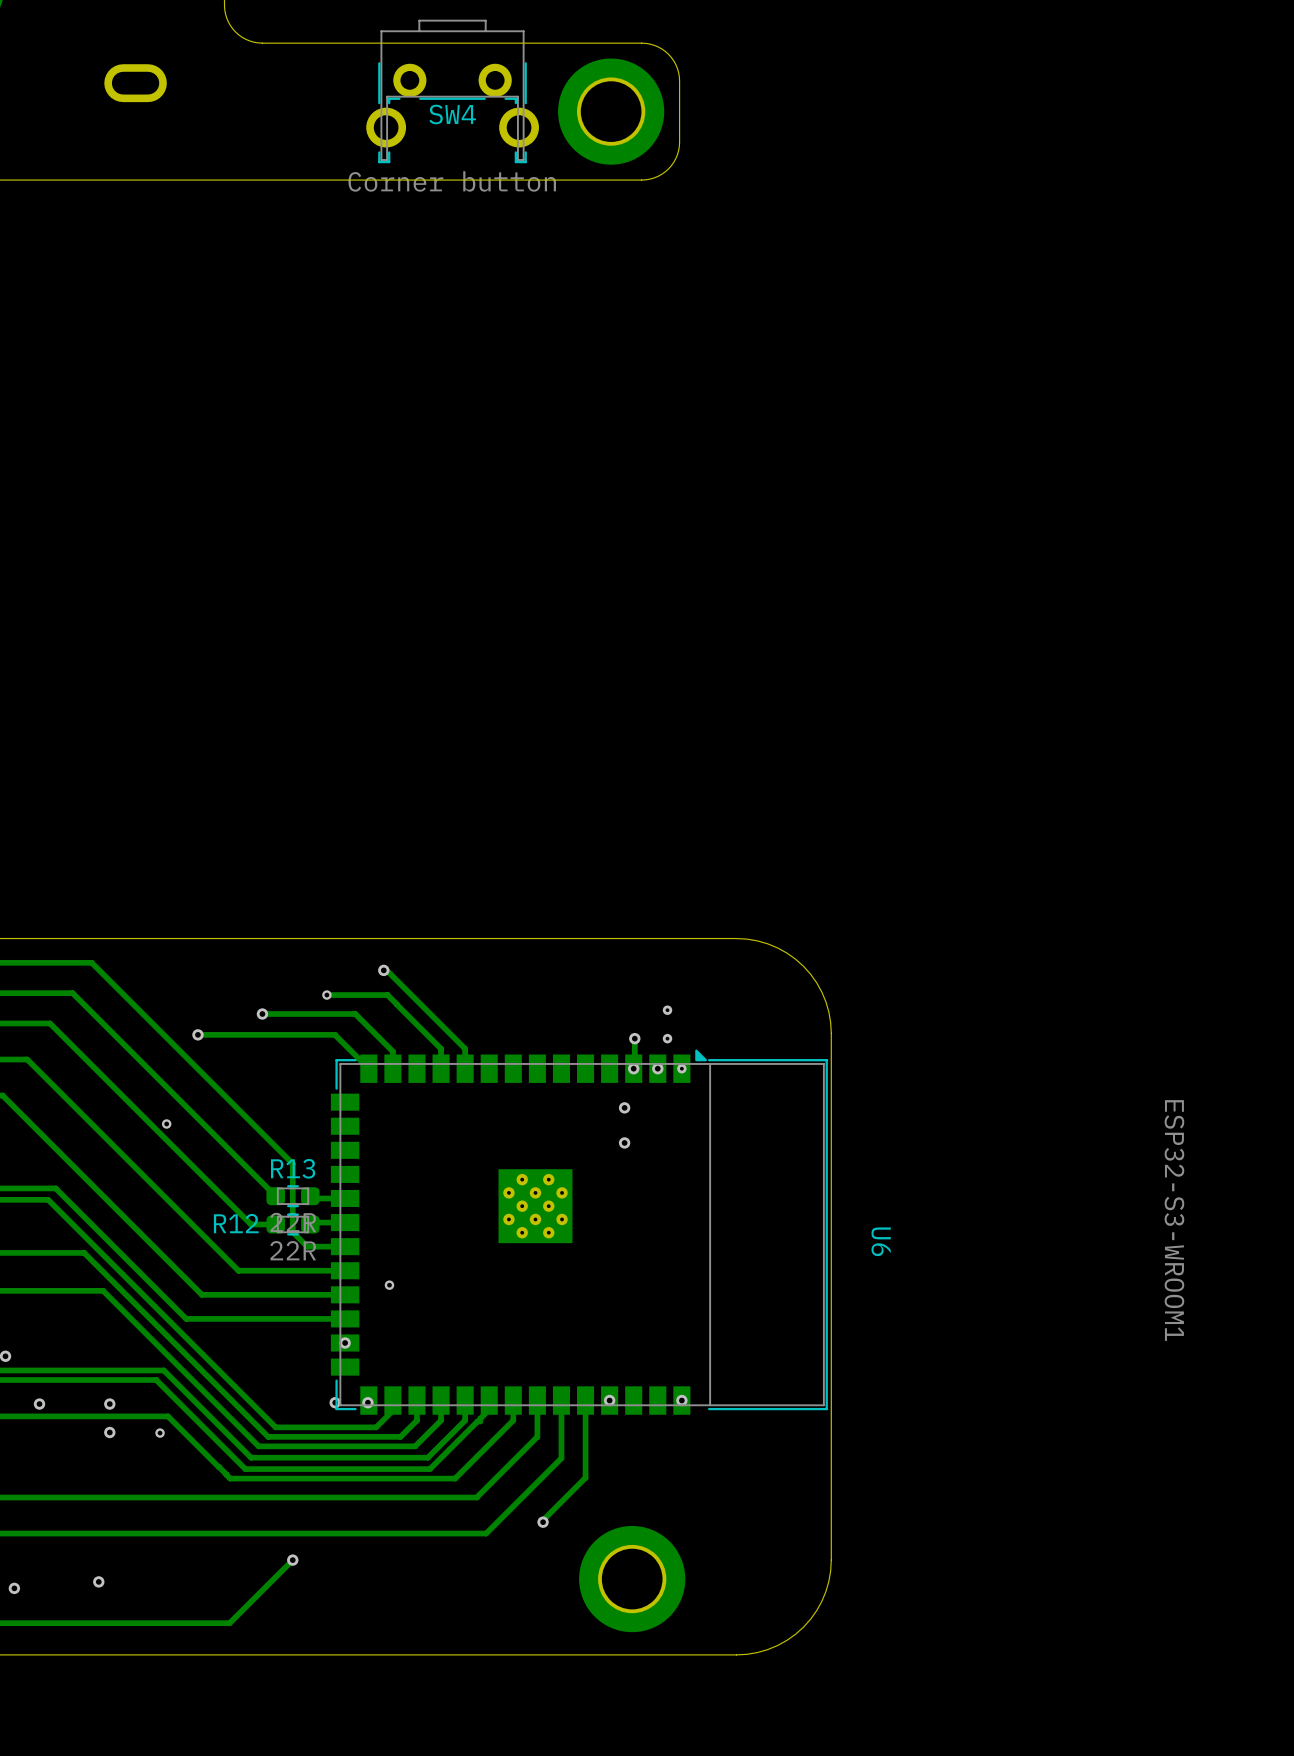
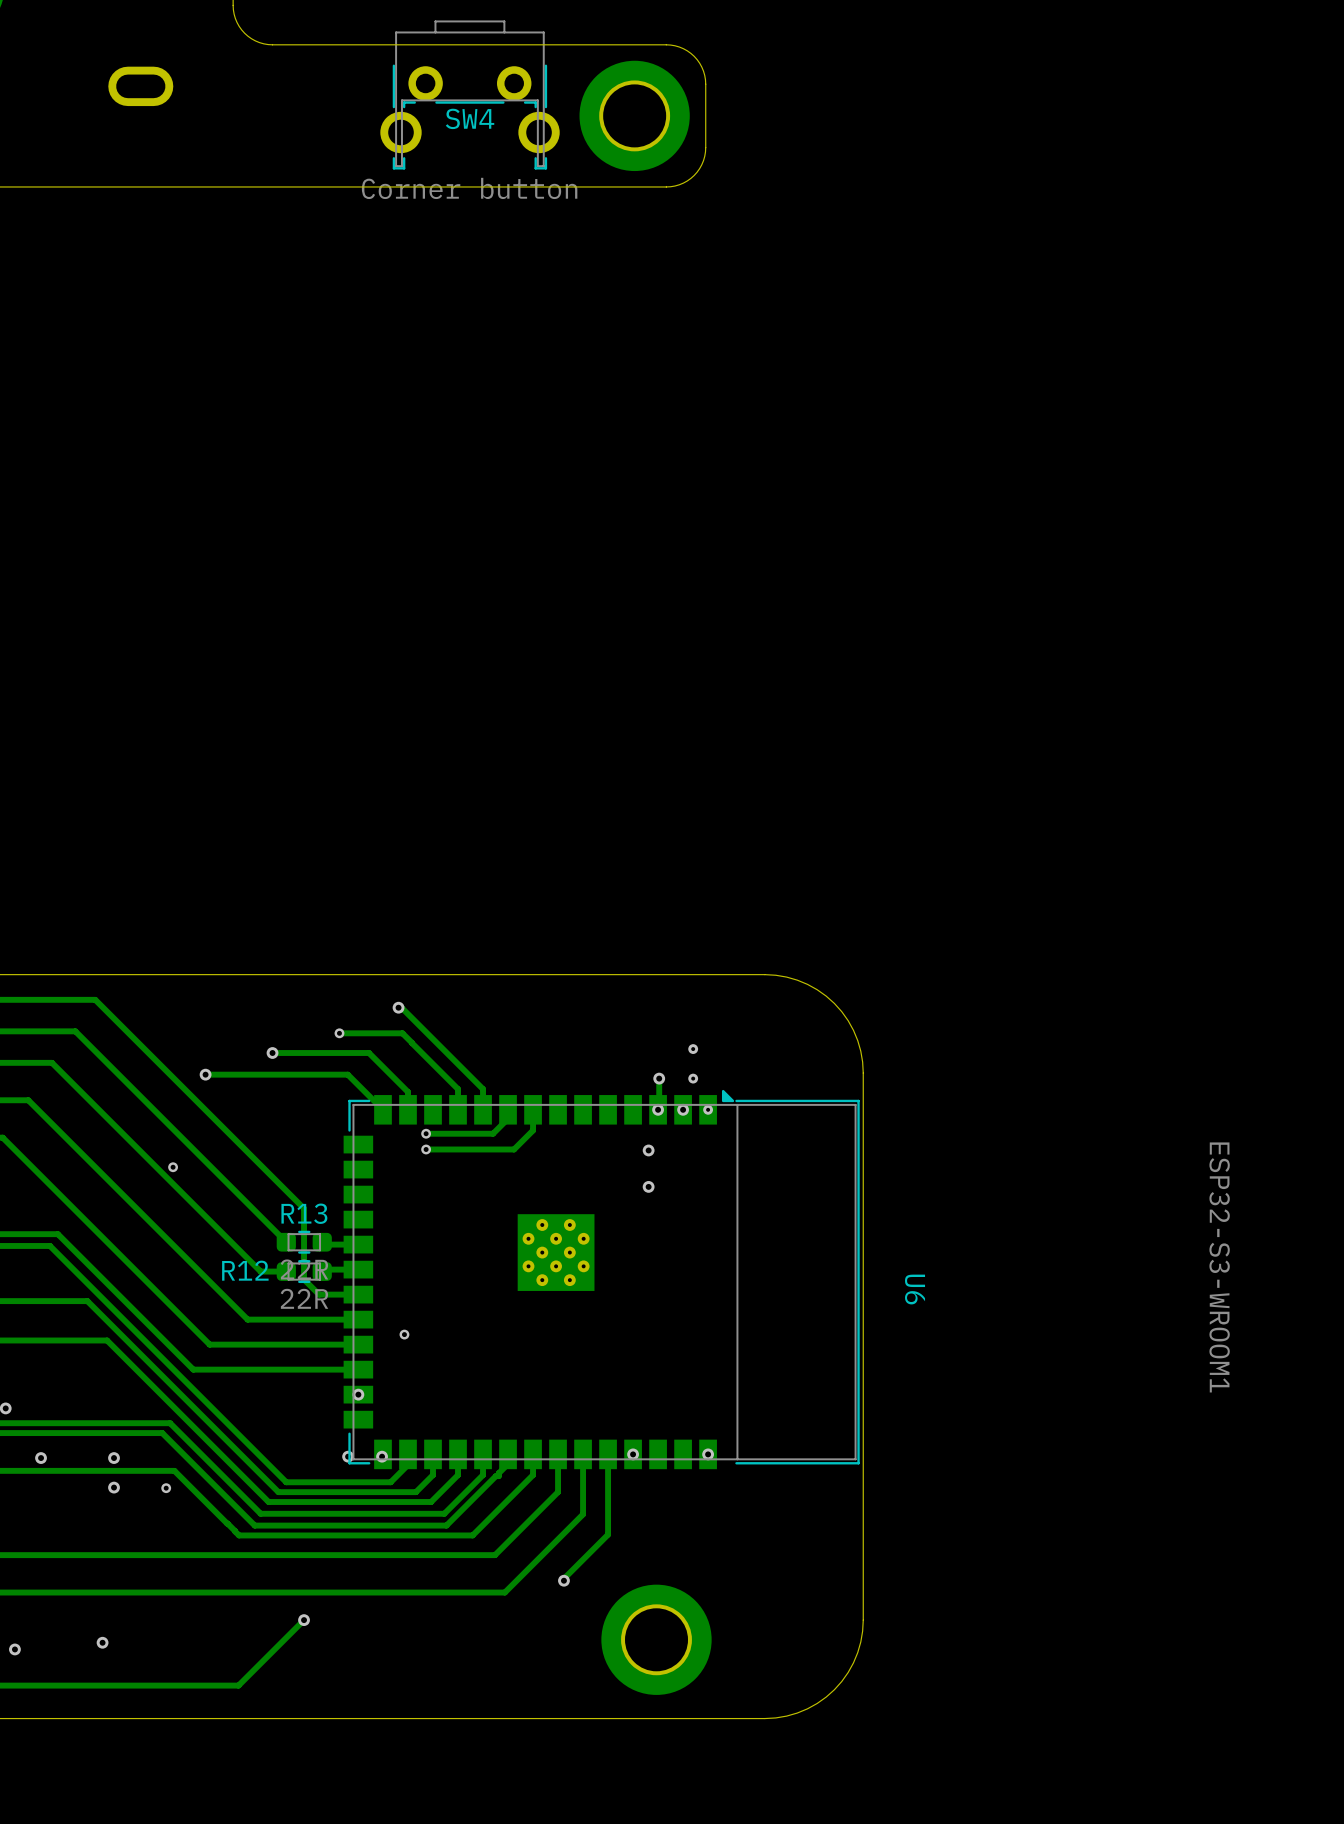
track: none -> (533, 1109) (533, 1130) (514, 1149) (426, 1149)
track: none -> (508, 1118) (493, 1133) (426, 1133)
via: none -> (426, 1133)
via: none -> (426, 1149)

